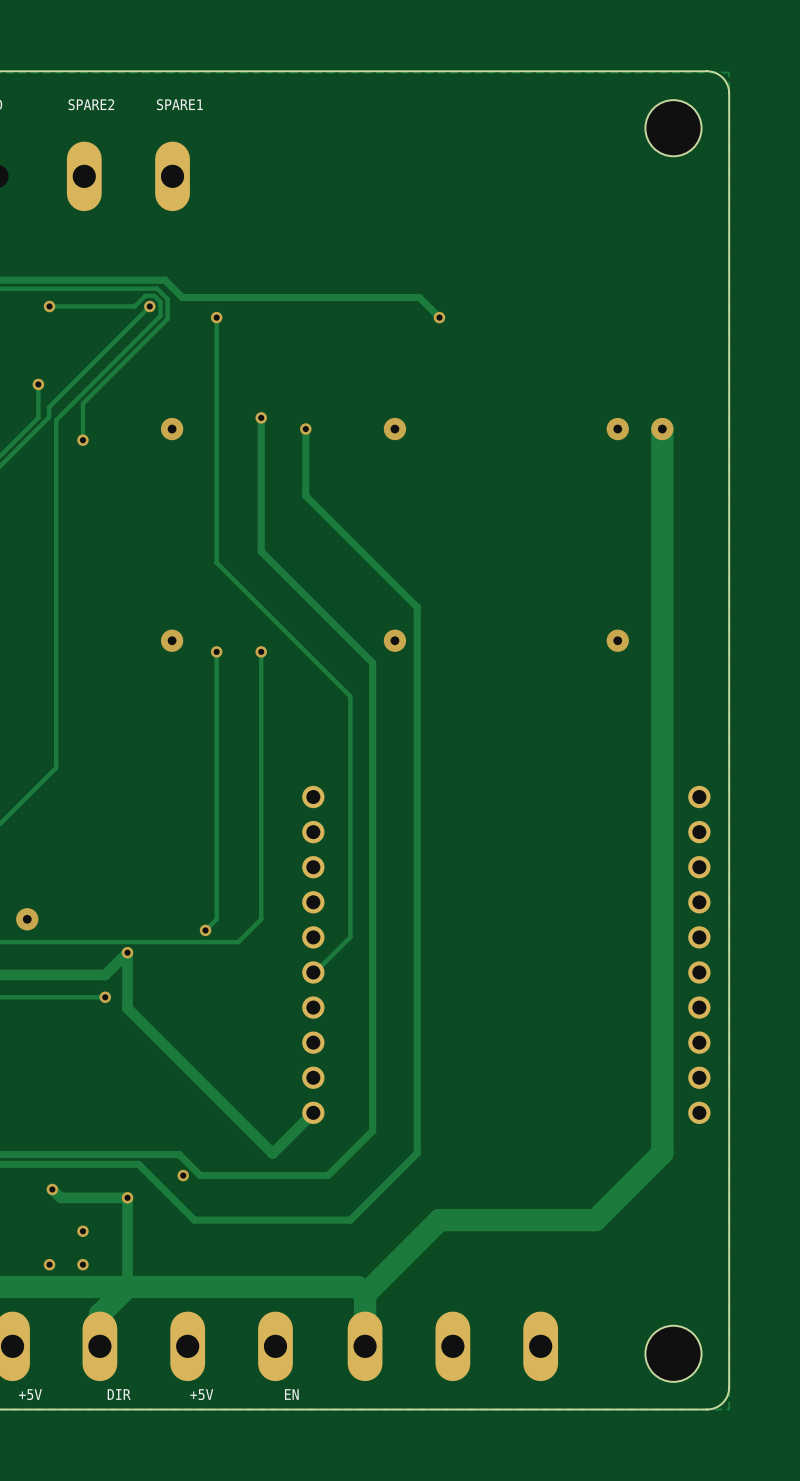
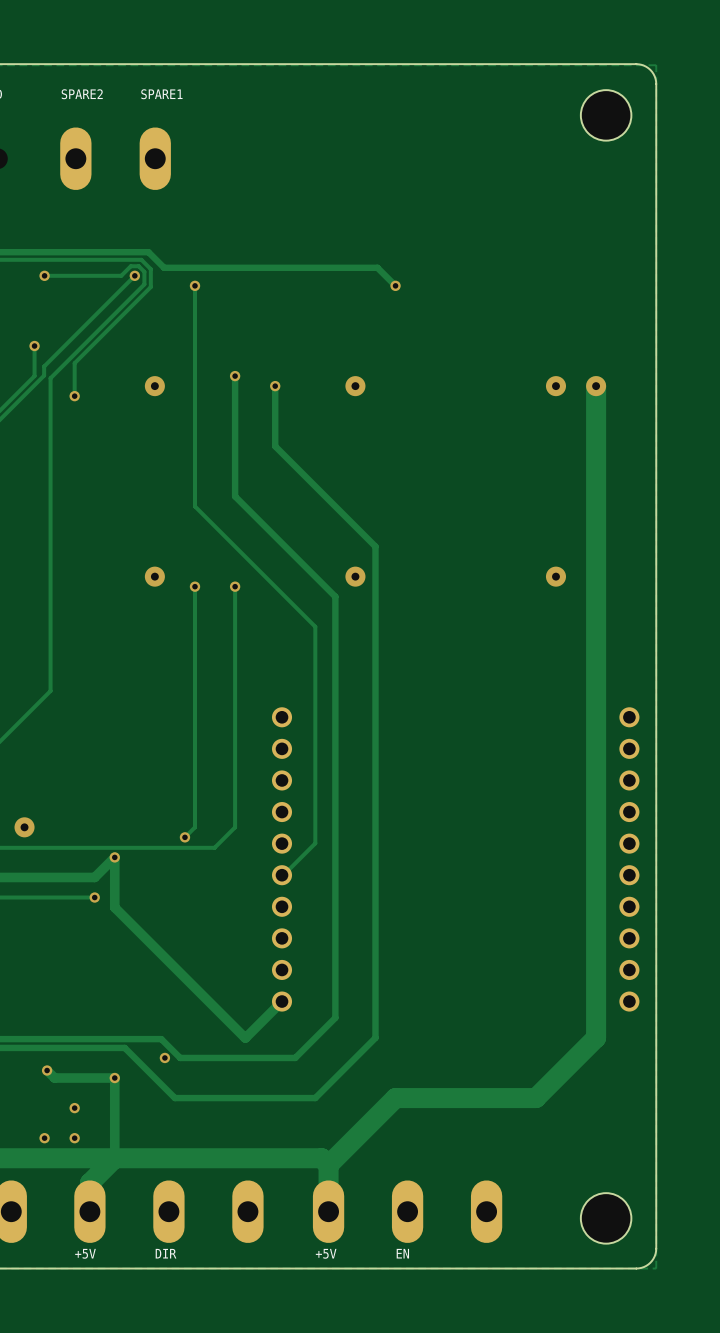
text: none -> +5V (85, 1253)
text: none -> +5V (326, 1253)
text: +5V (30, 1394) -> none
text position: DIR (119, 1394) -> DIR (166, 1253)
text: +5V (201, 1394) -> none
text position: EN (291, 1394) -> EN (402, 1253)

